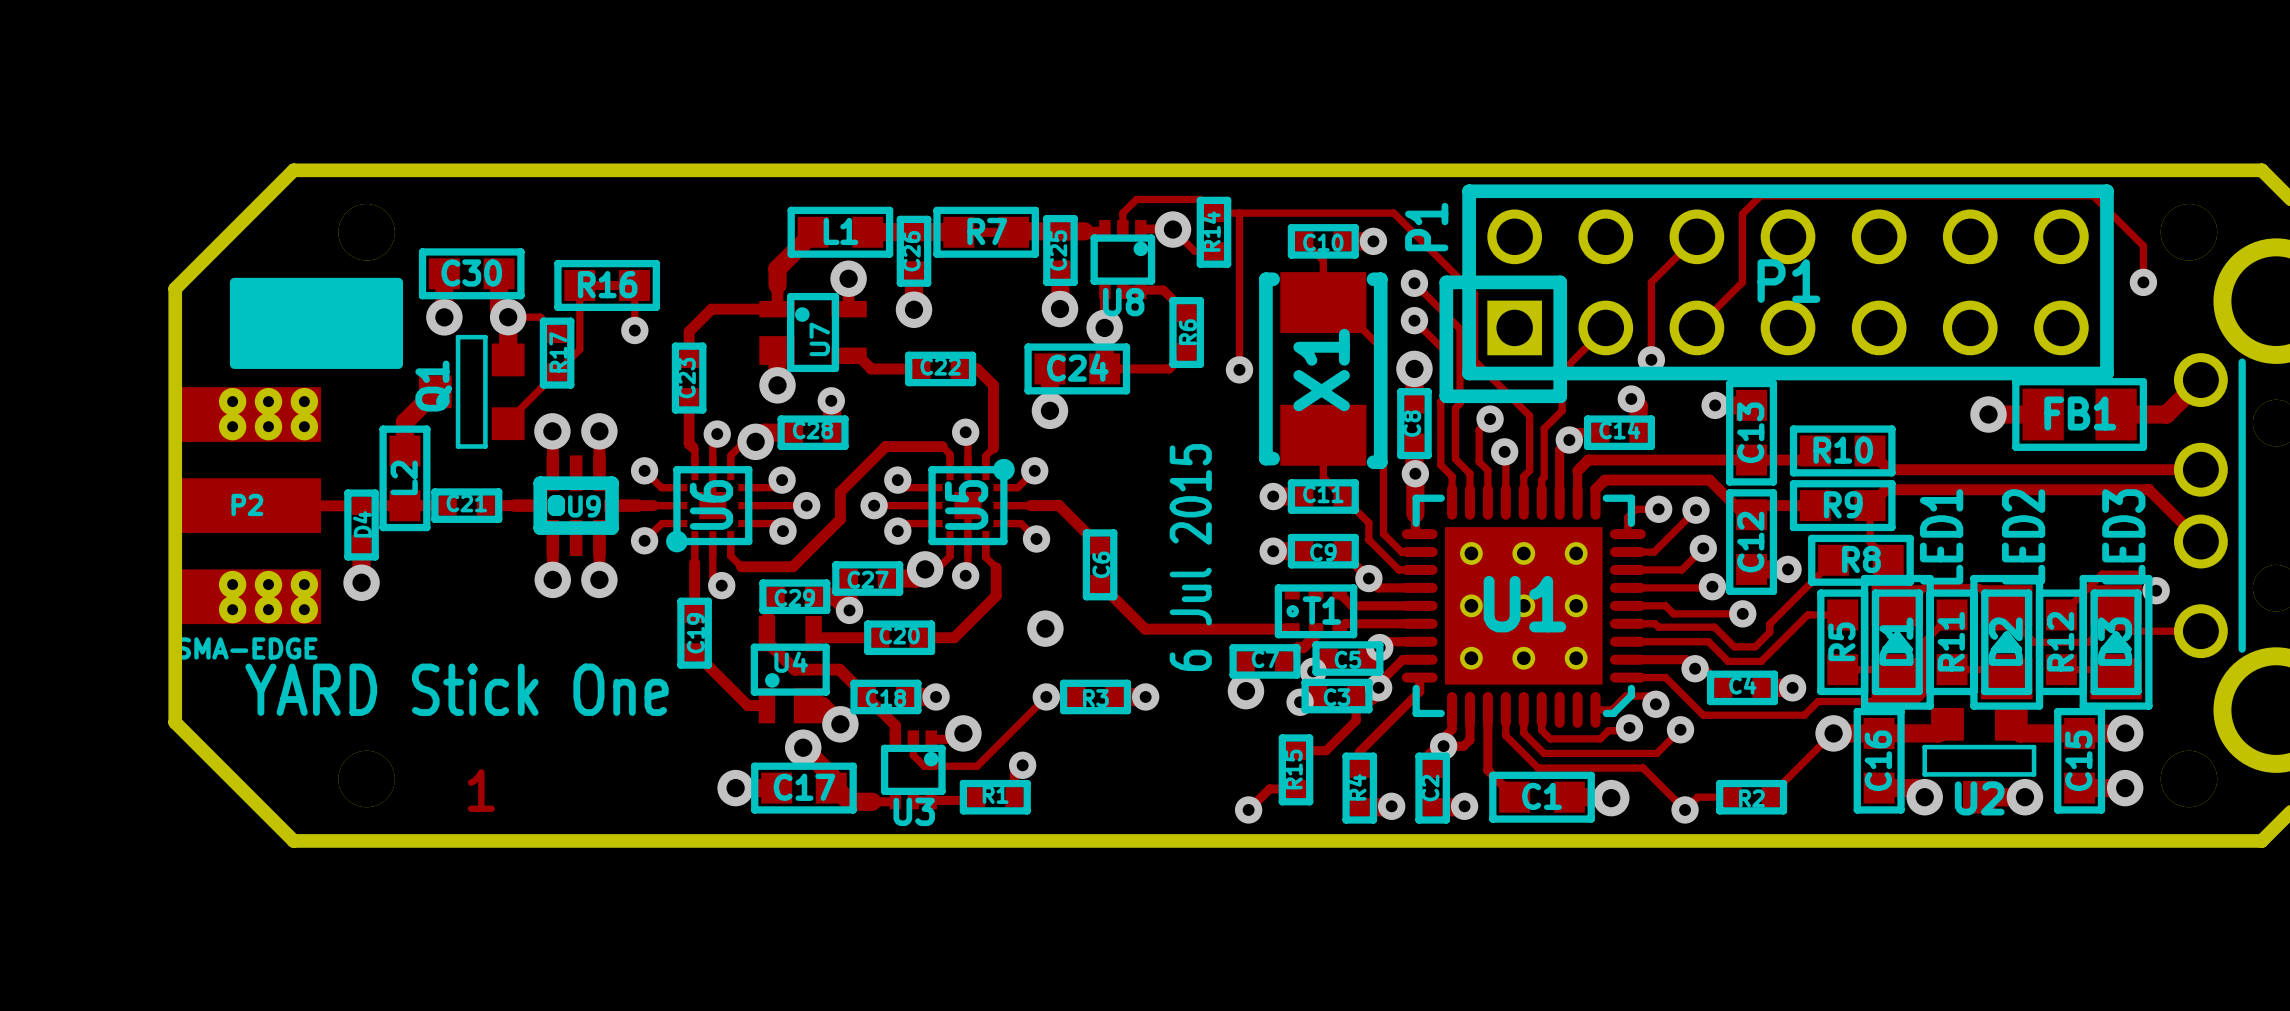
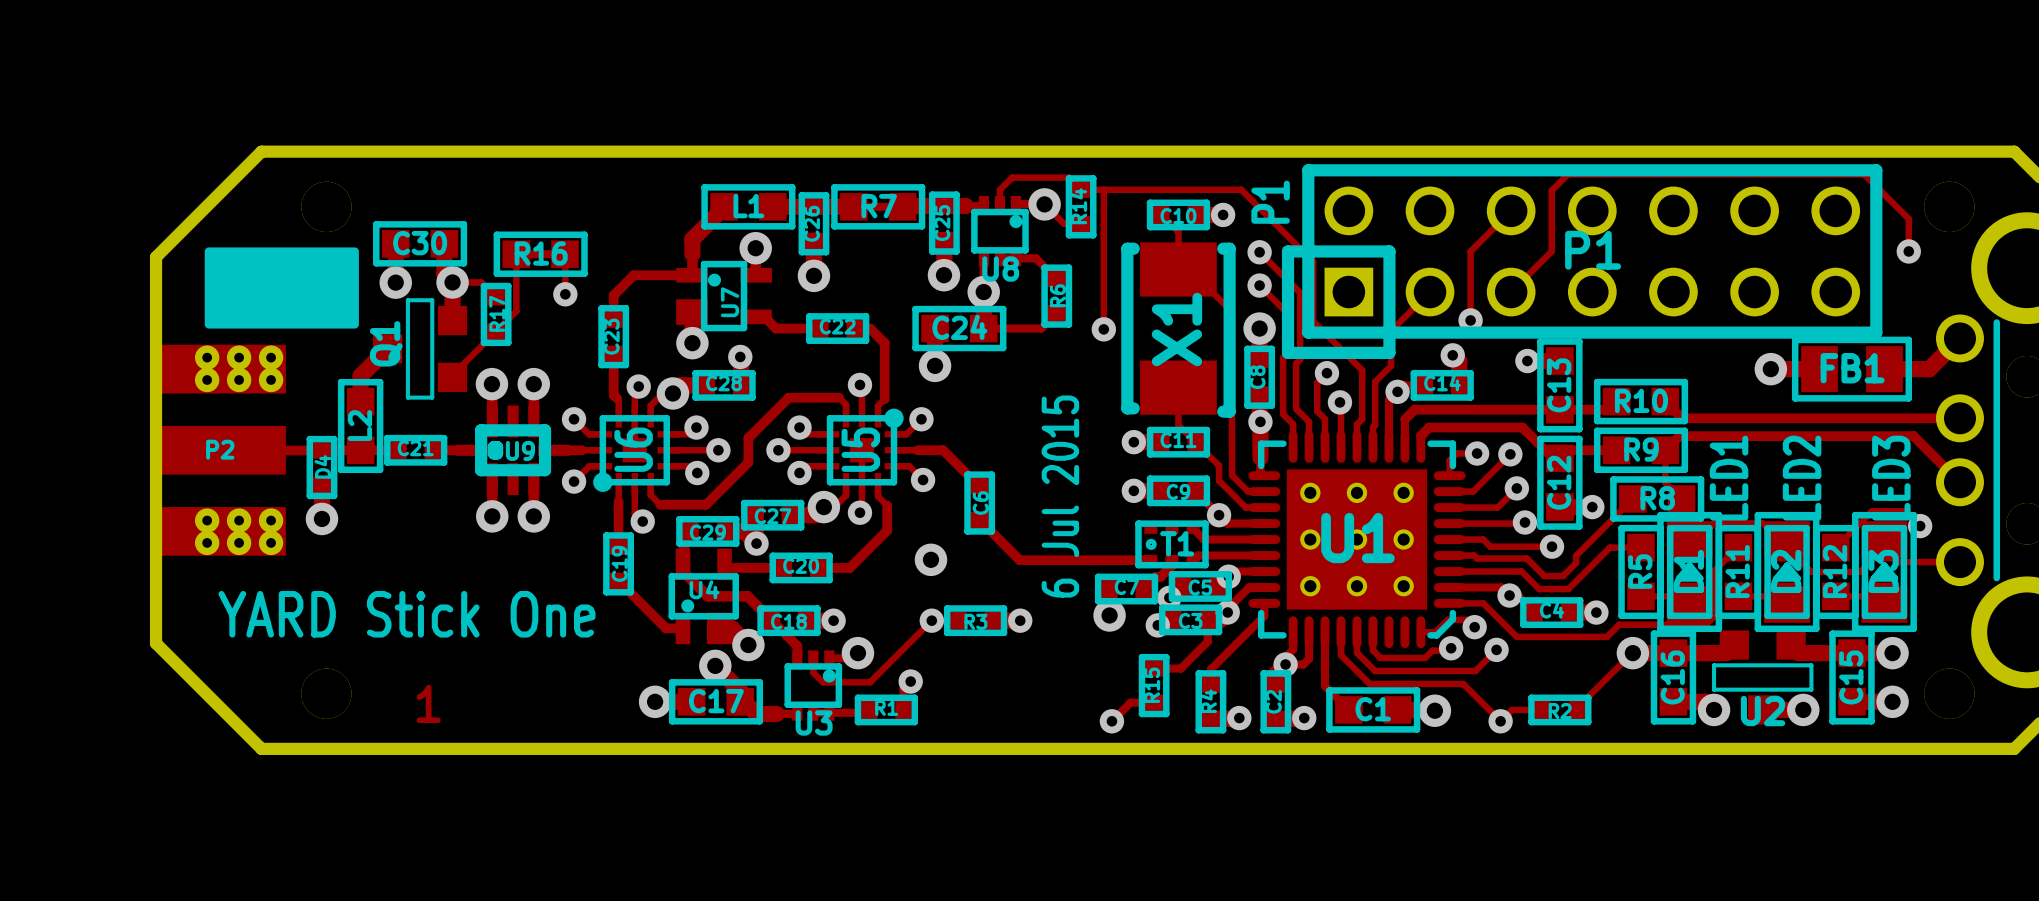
P2 value: SMA-EDGE (246, 648) -> none

